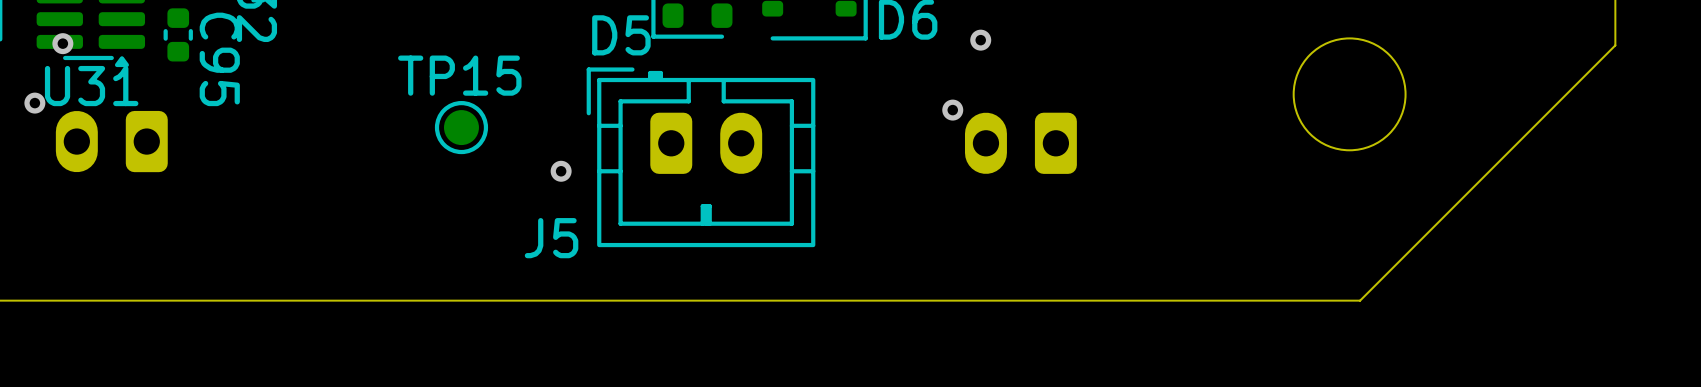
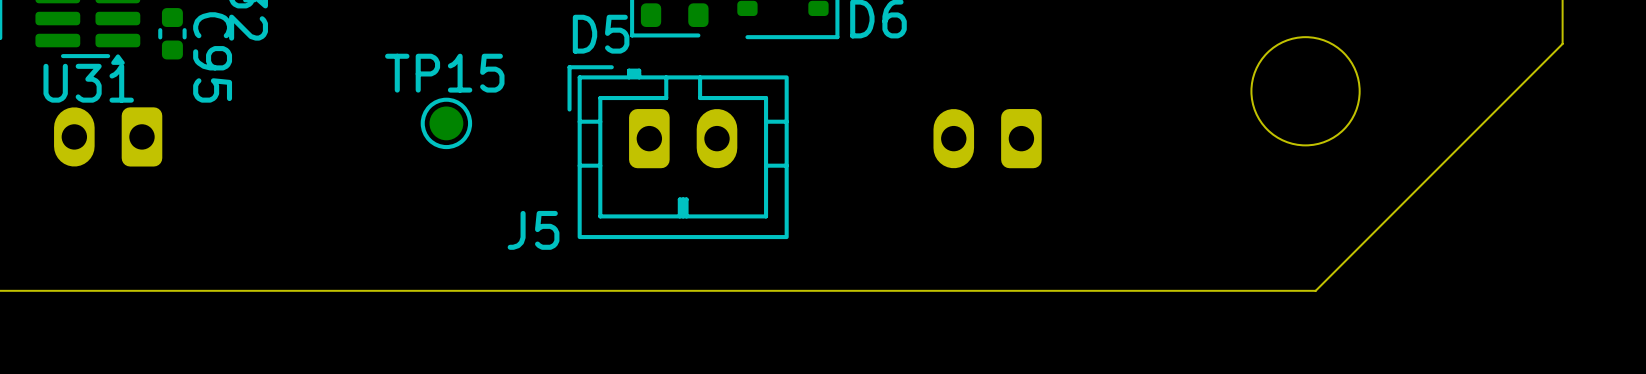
via: (980, 40) -> none
via: (62, 43) -> none
via: (34, 103) -> none
via: (952, 110) -> none
via: (561, 171) -> none

